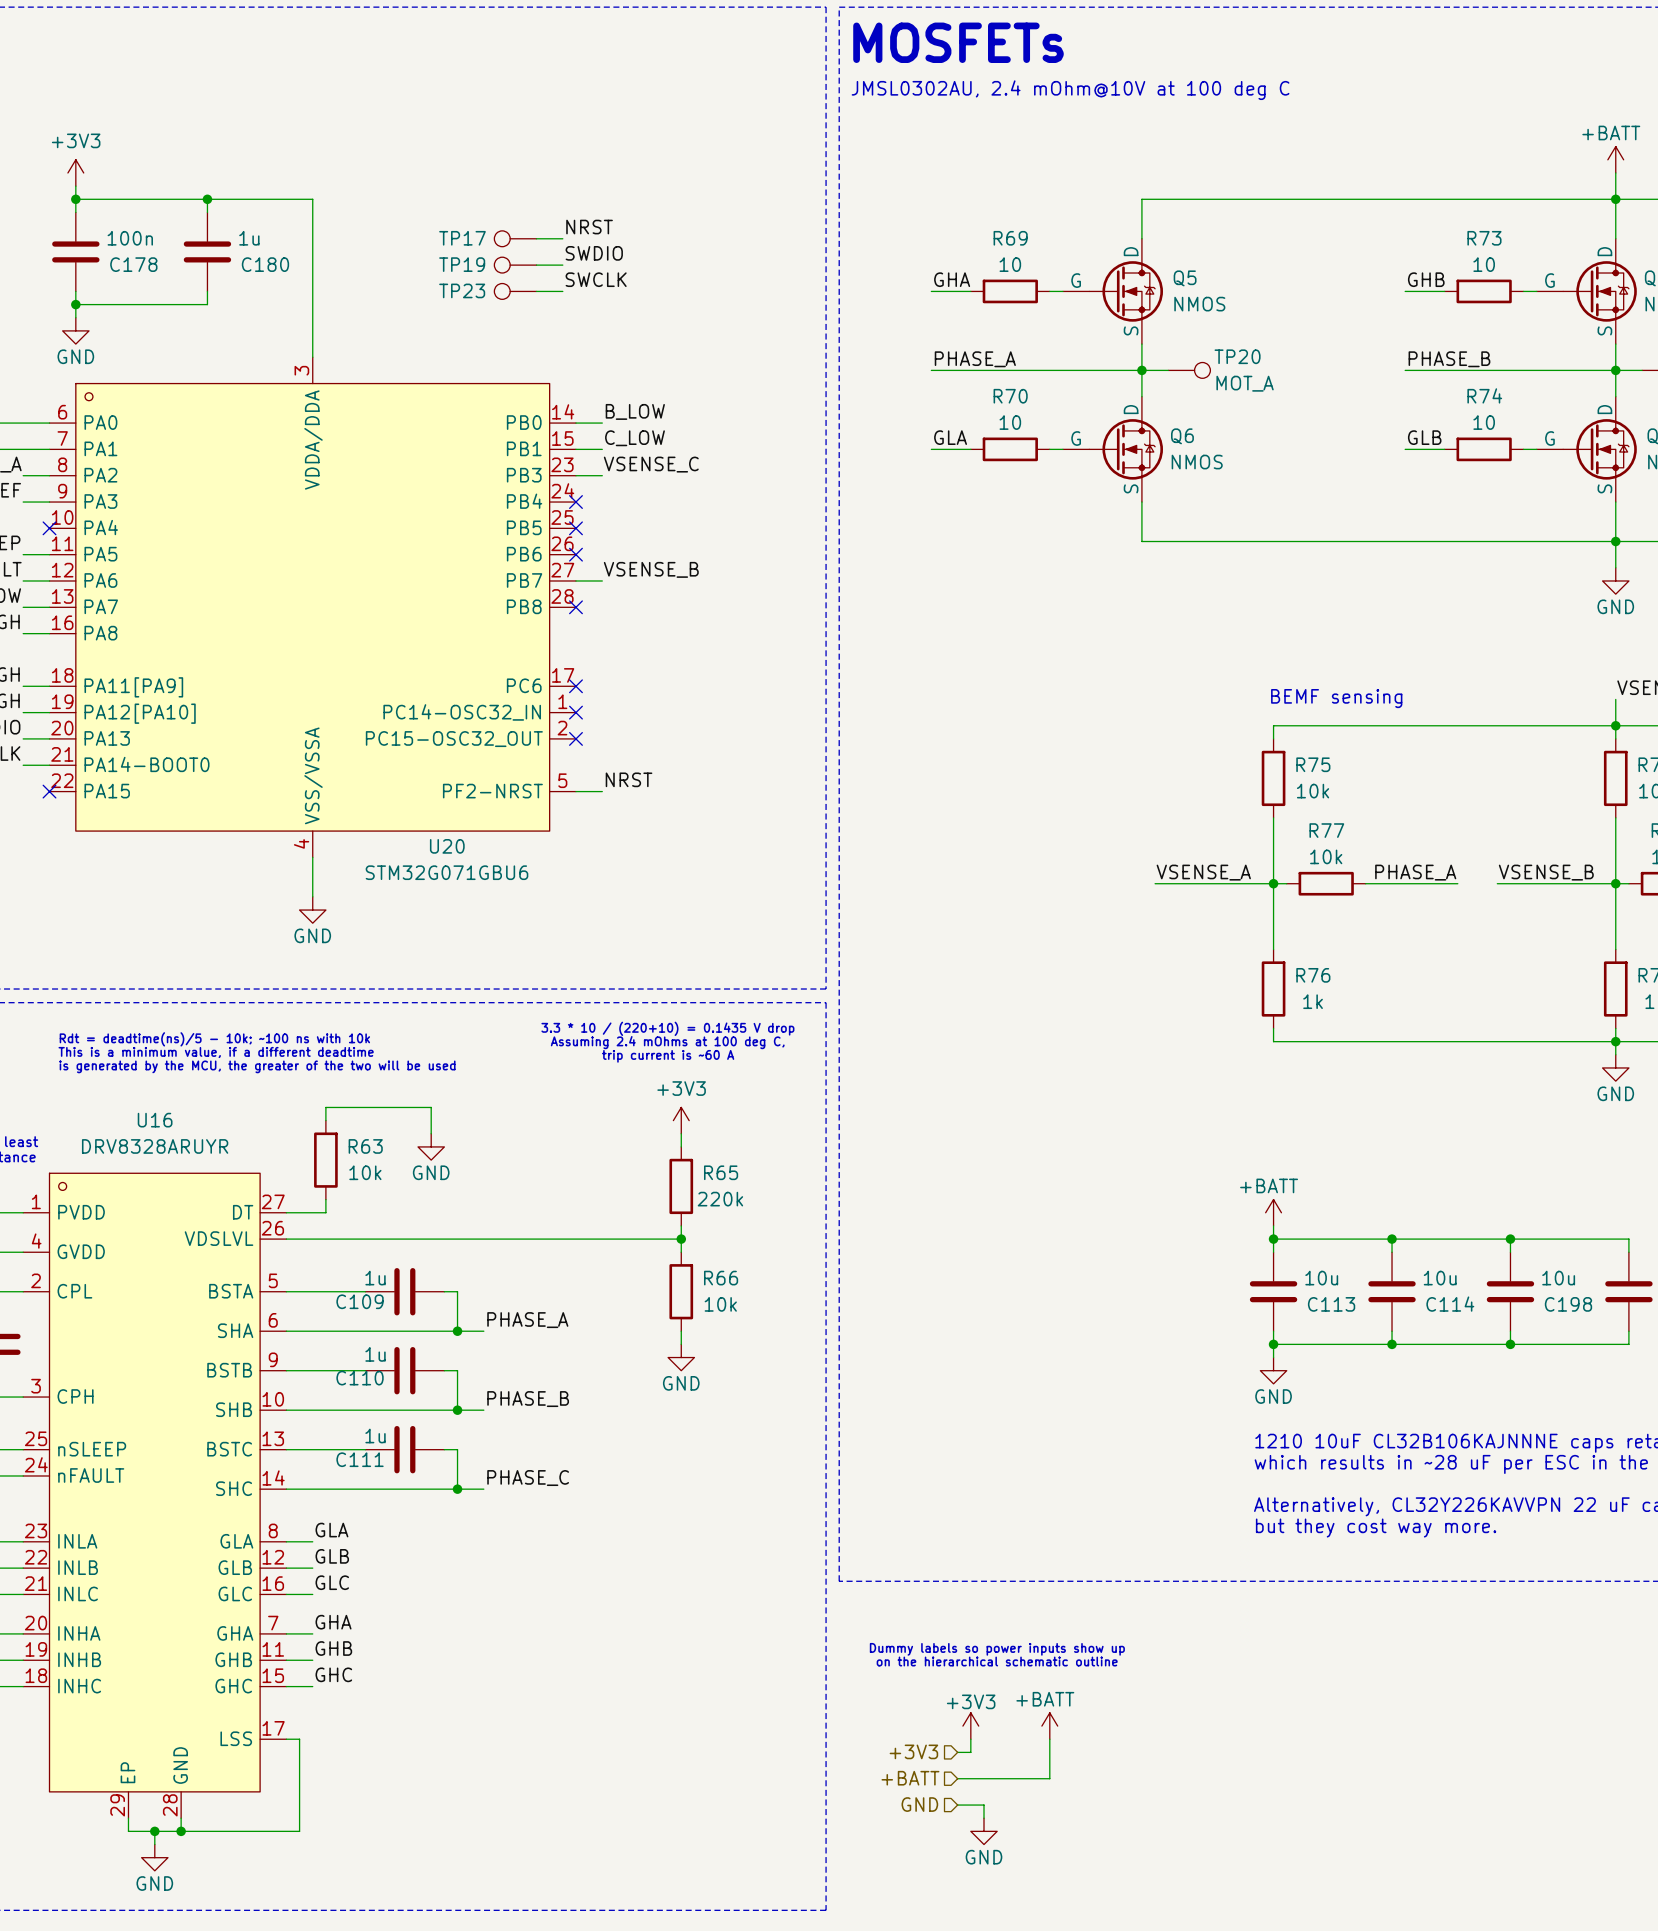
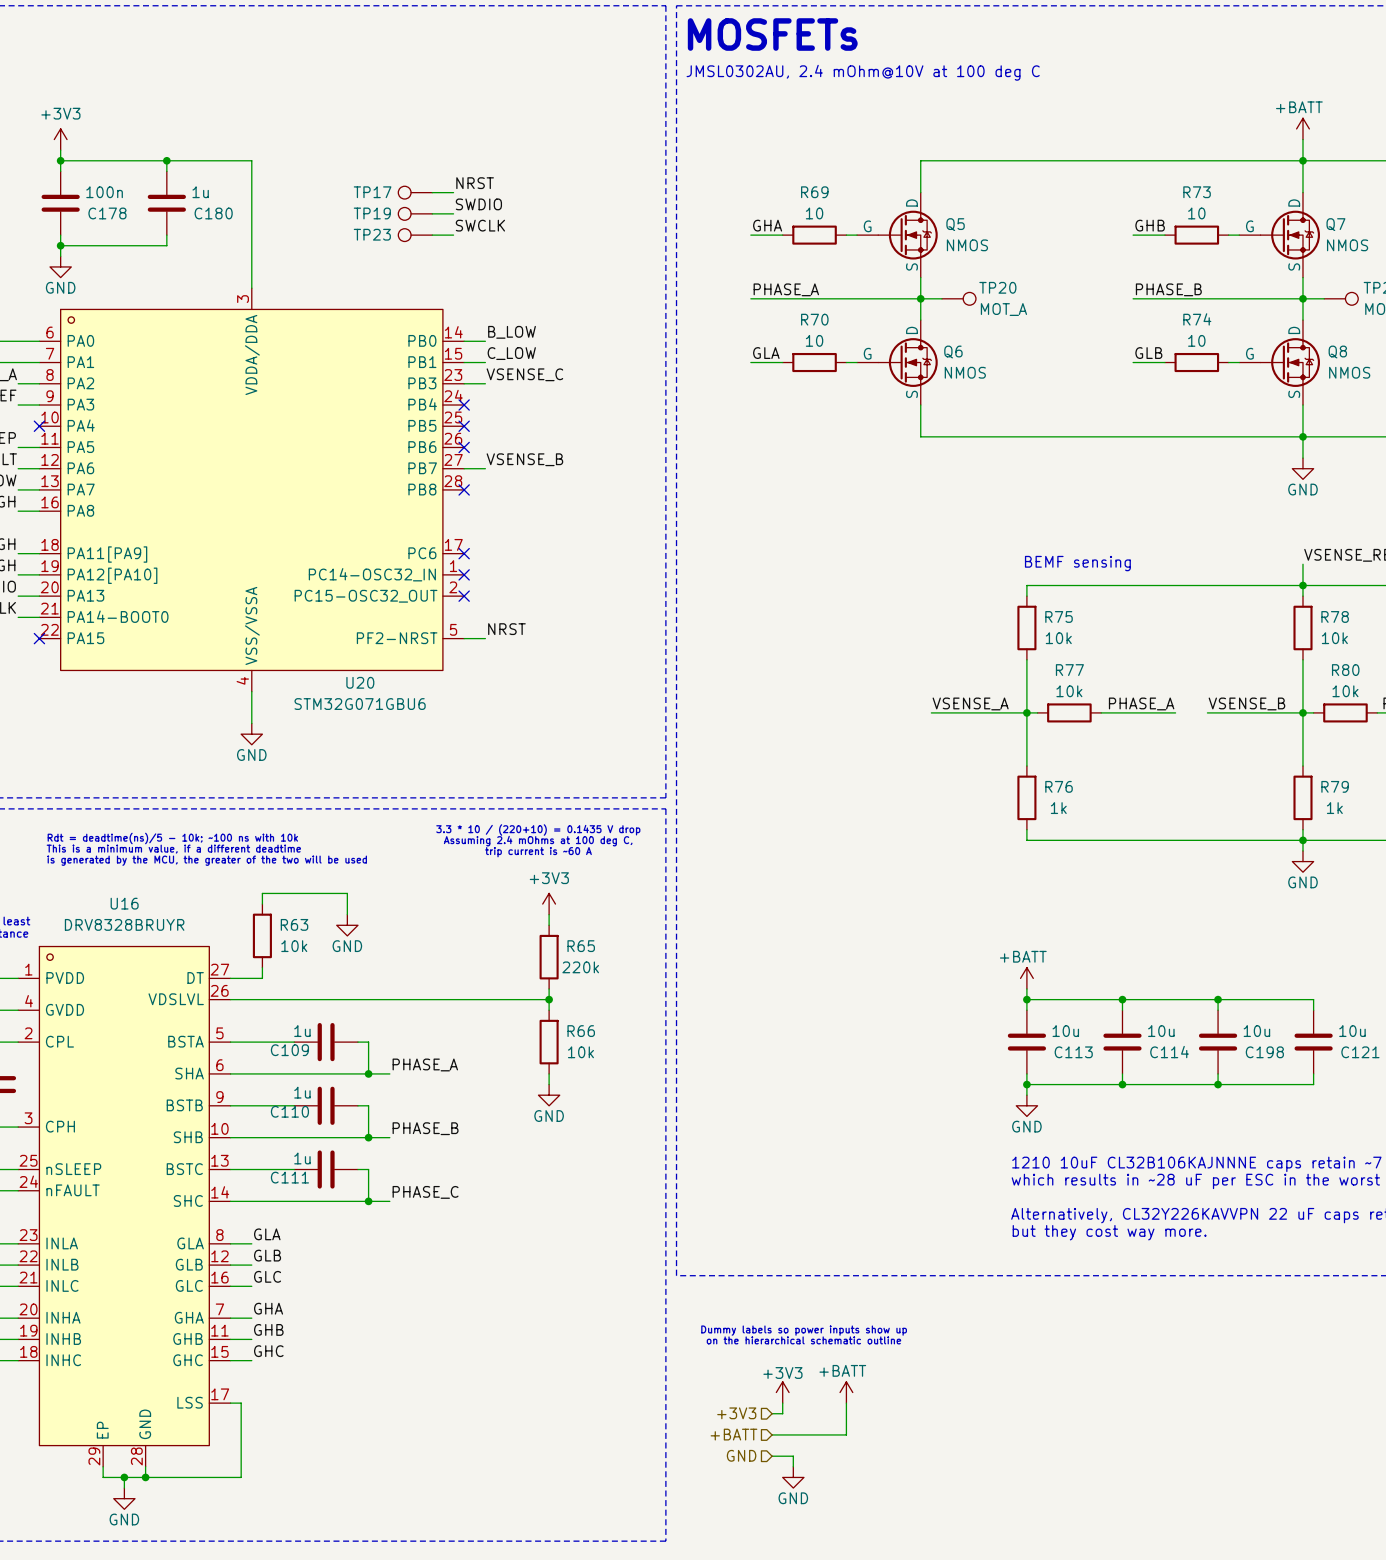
U16 value: DRV8328ARUYR (155, 1146) -> DRV8328BRUYR (124, 924)

